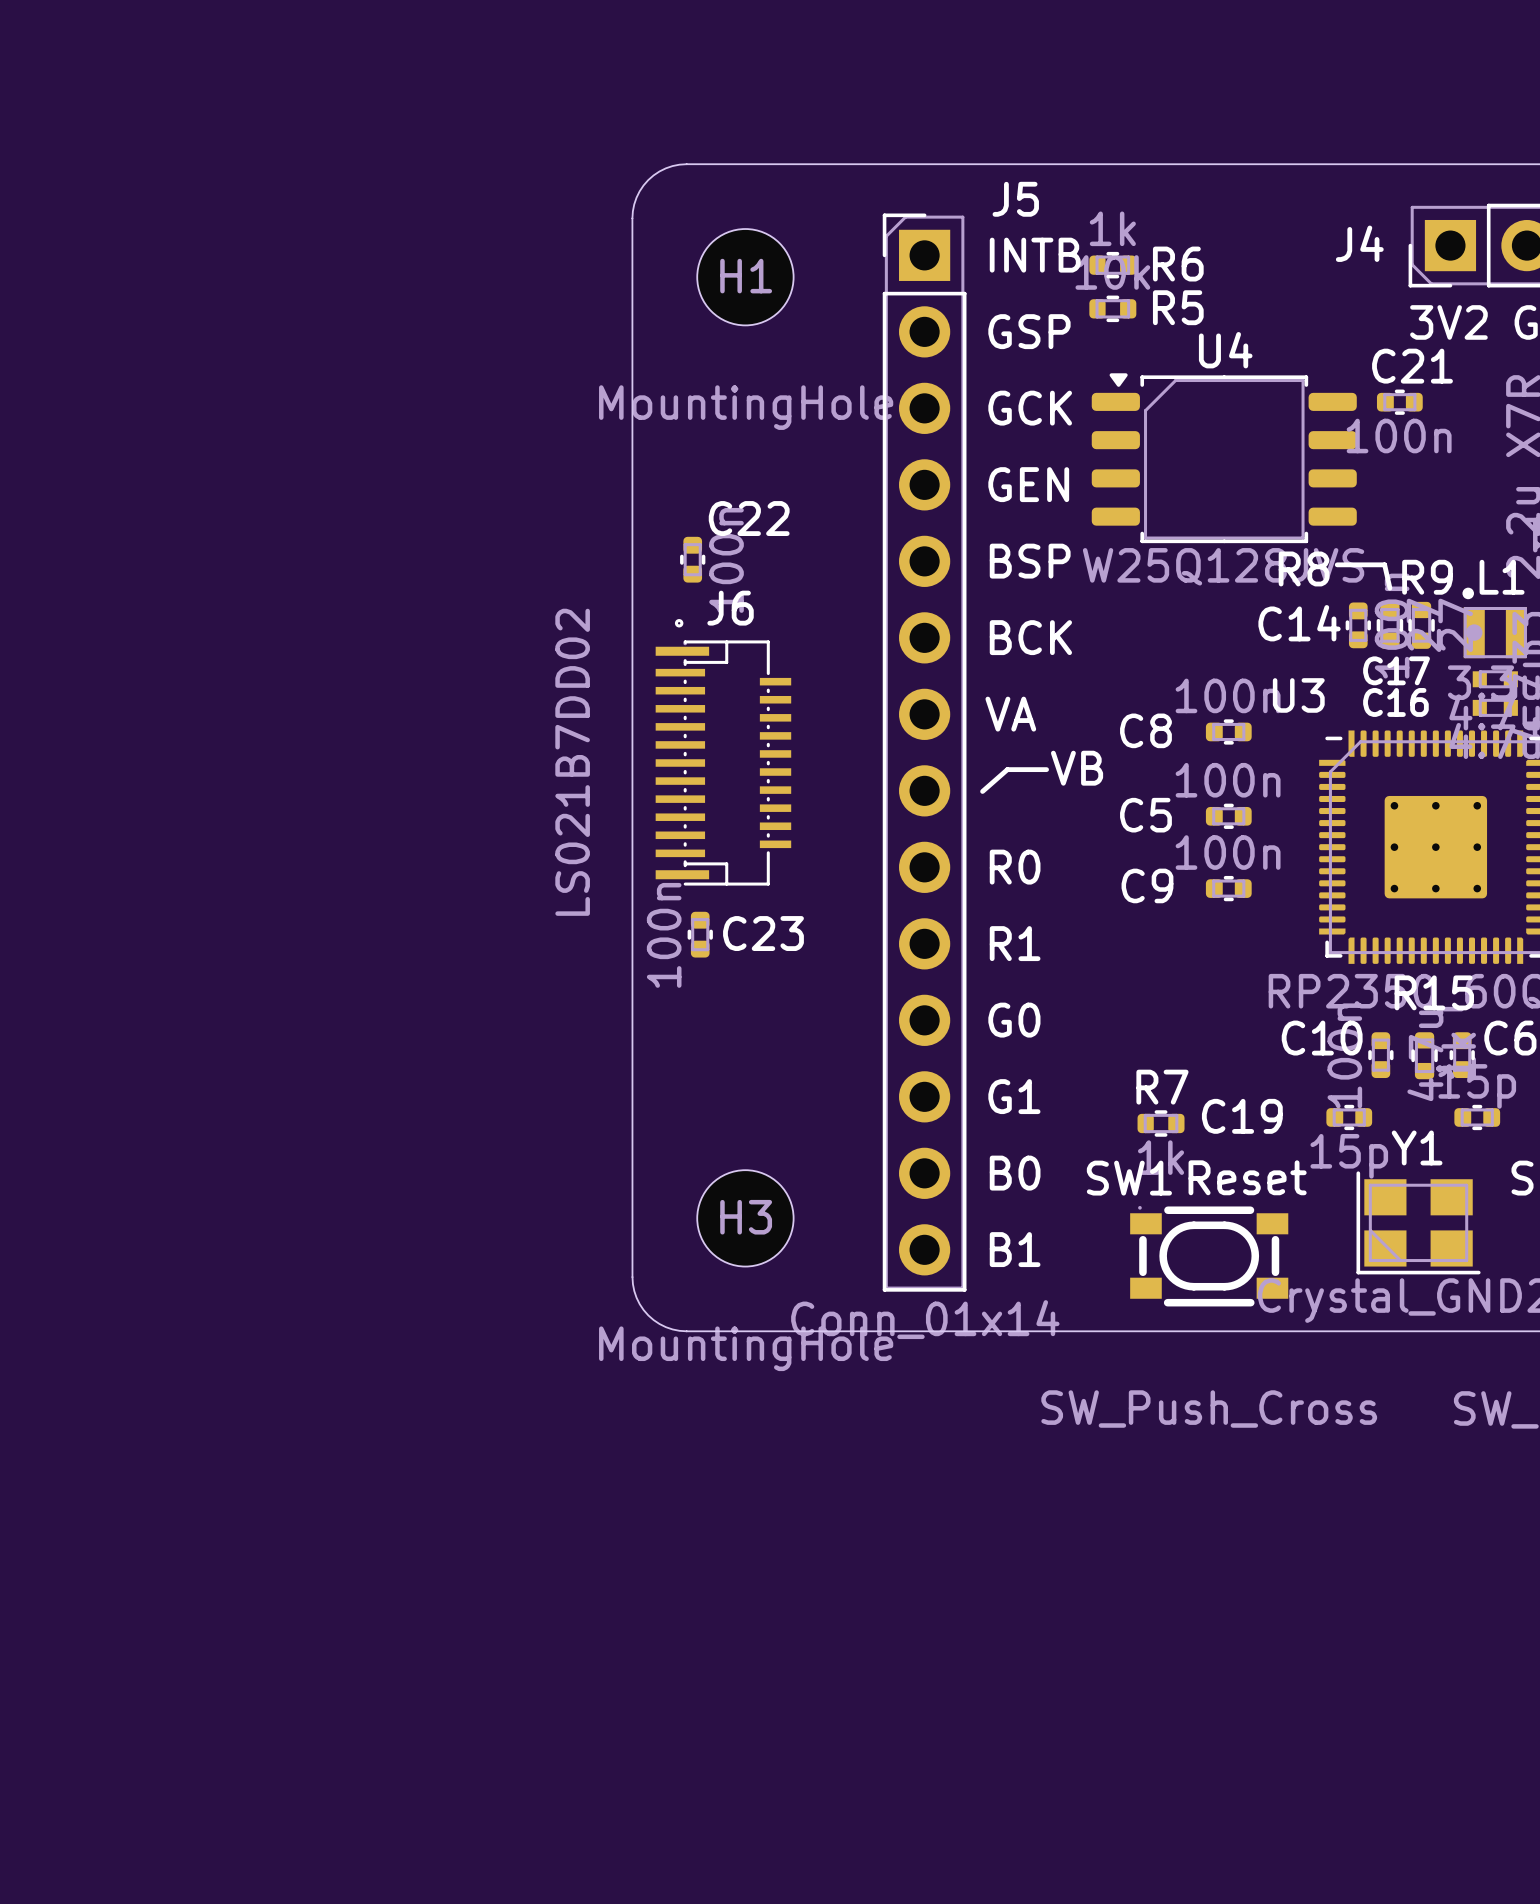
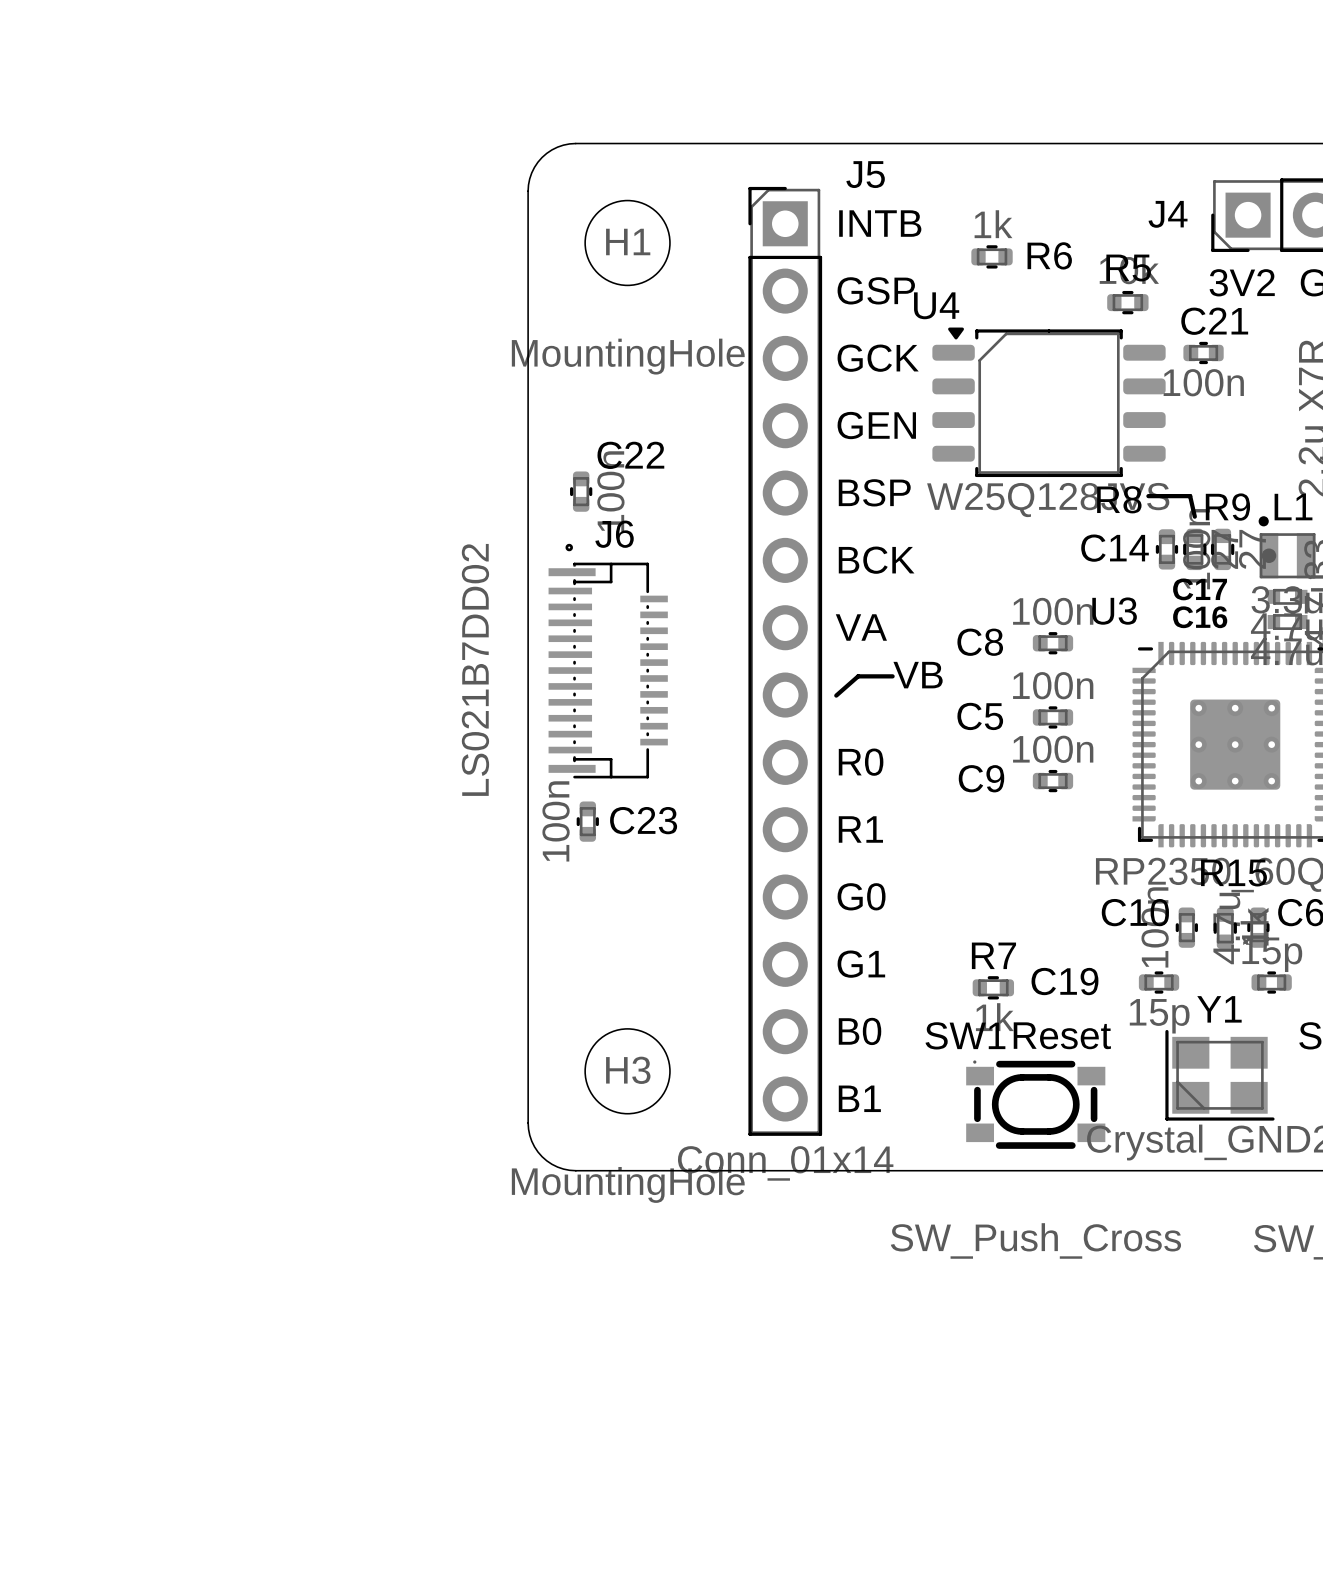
R6 position: (1112, 265) -> (992, 256)
R5 name position: R5 (1178, 307) -> R5 (1128, 268)
R5 position: (1112, 308) -> (1127, 302)
U4 name position: U4 (1225, 350) -> U4 (936, 305)

